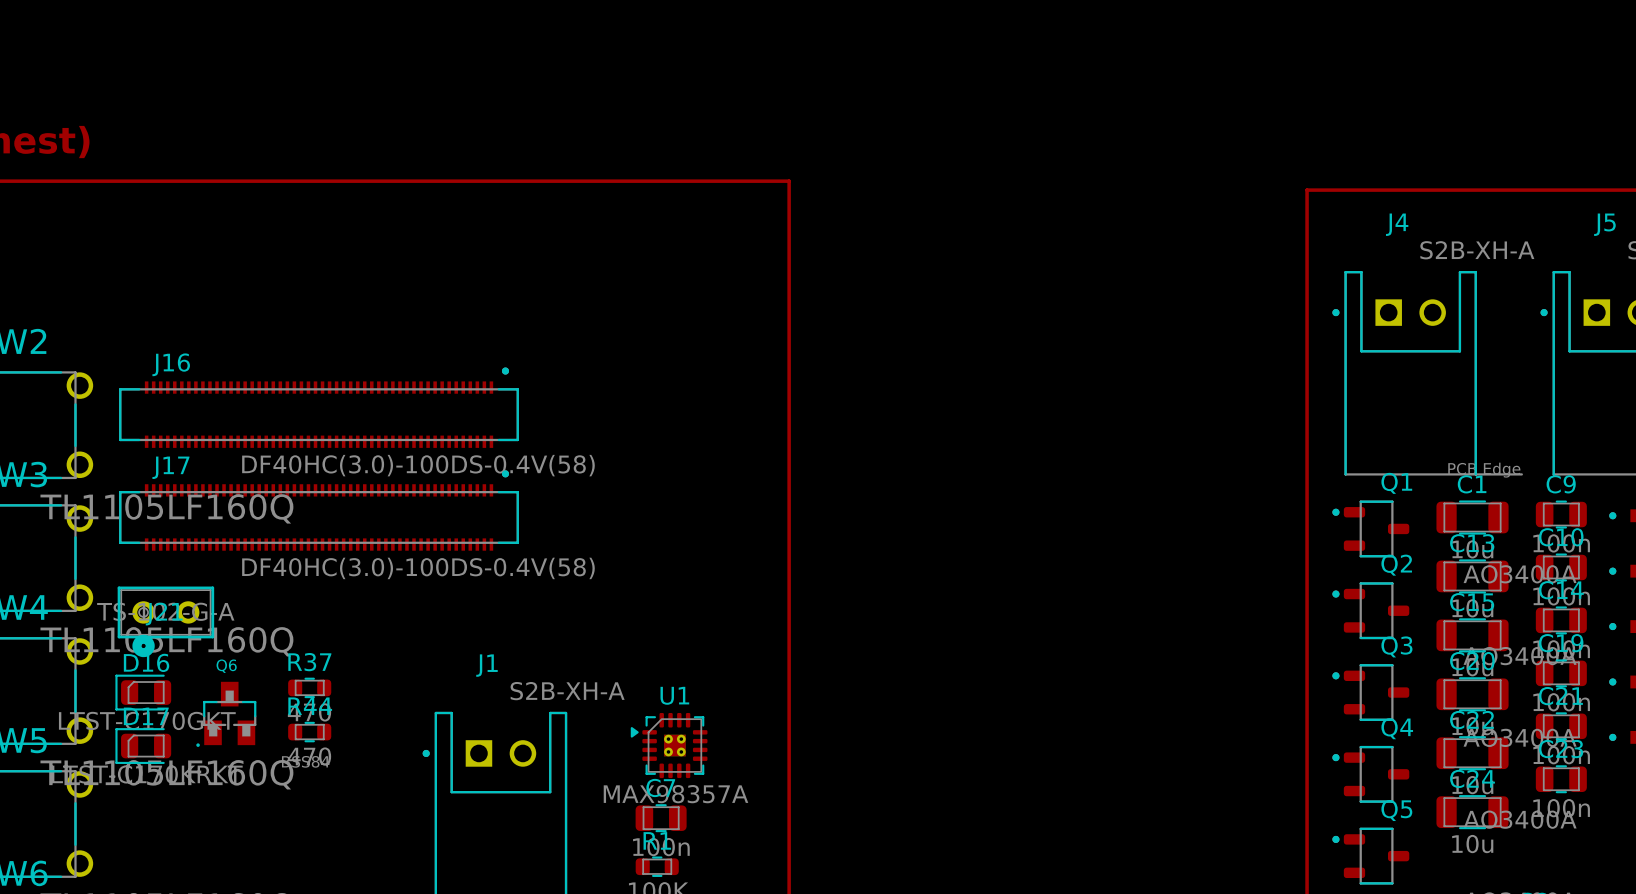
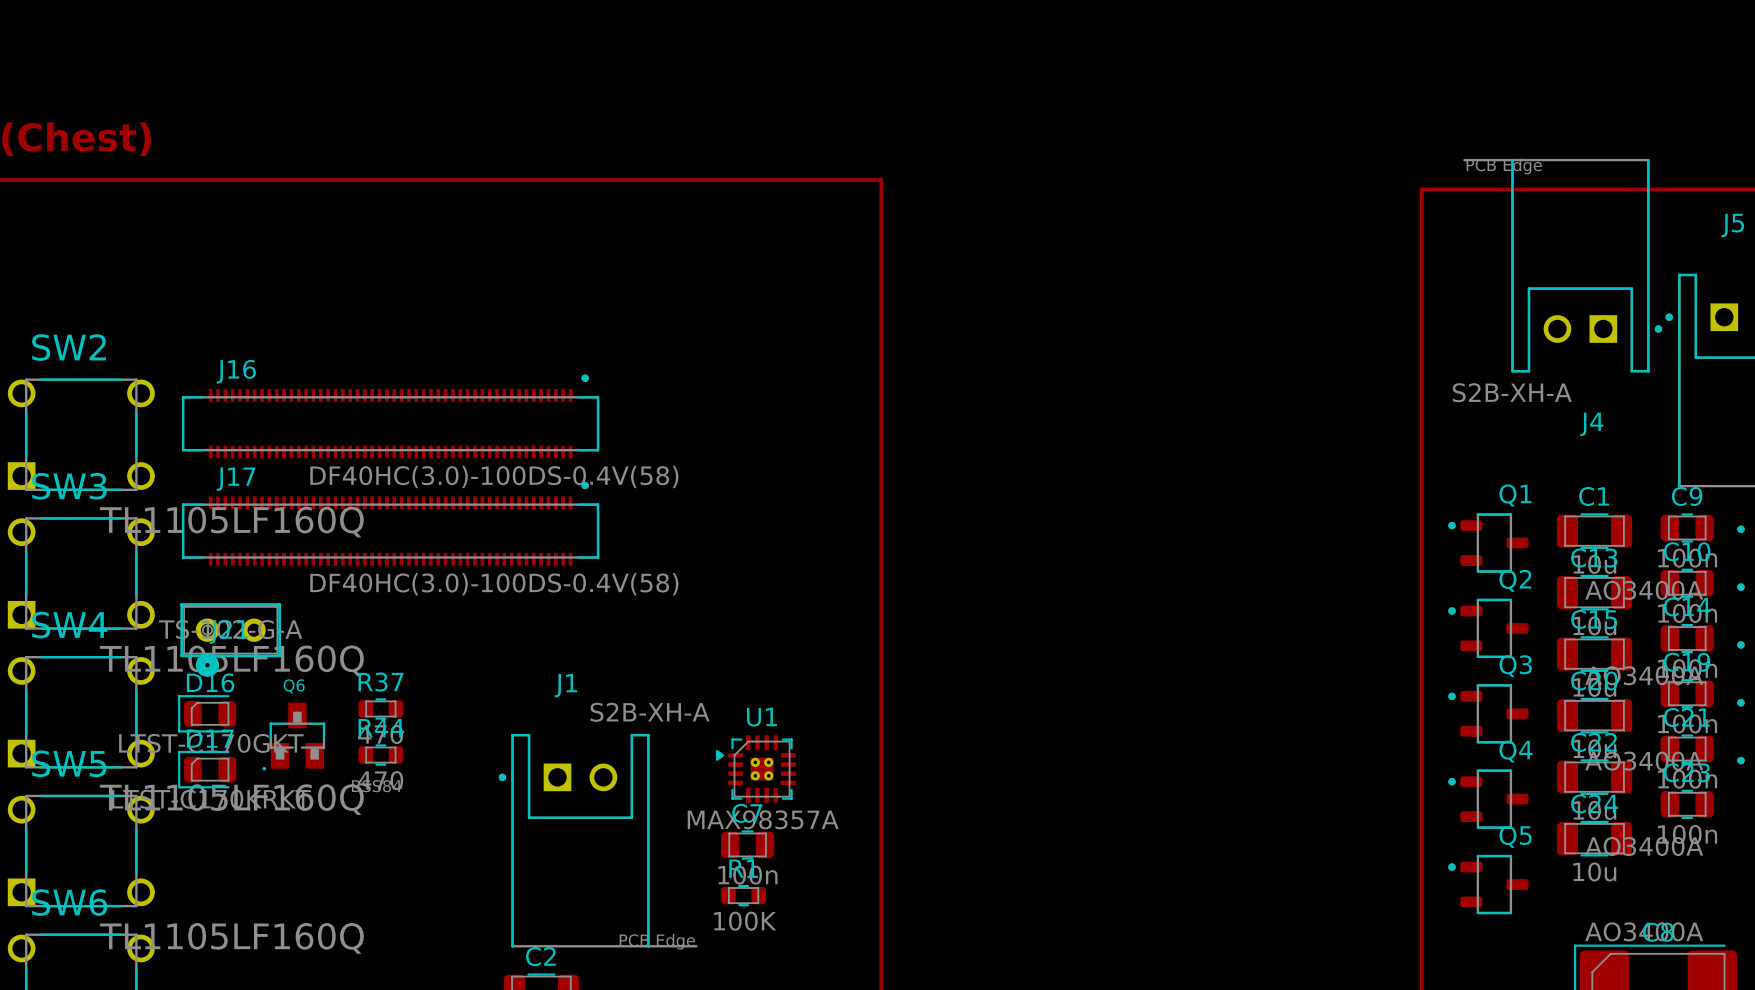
J4 rotation: 0° (1427, 373) -> 180° (1562, 265)

